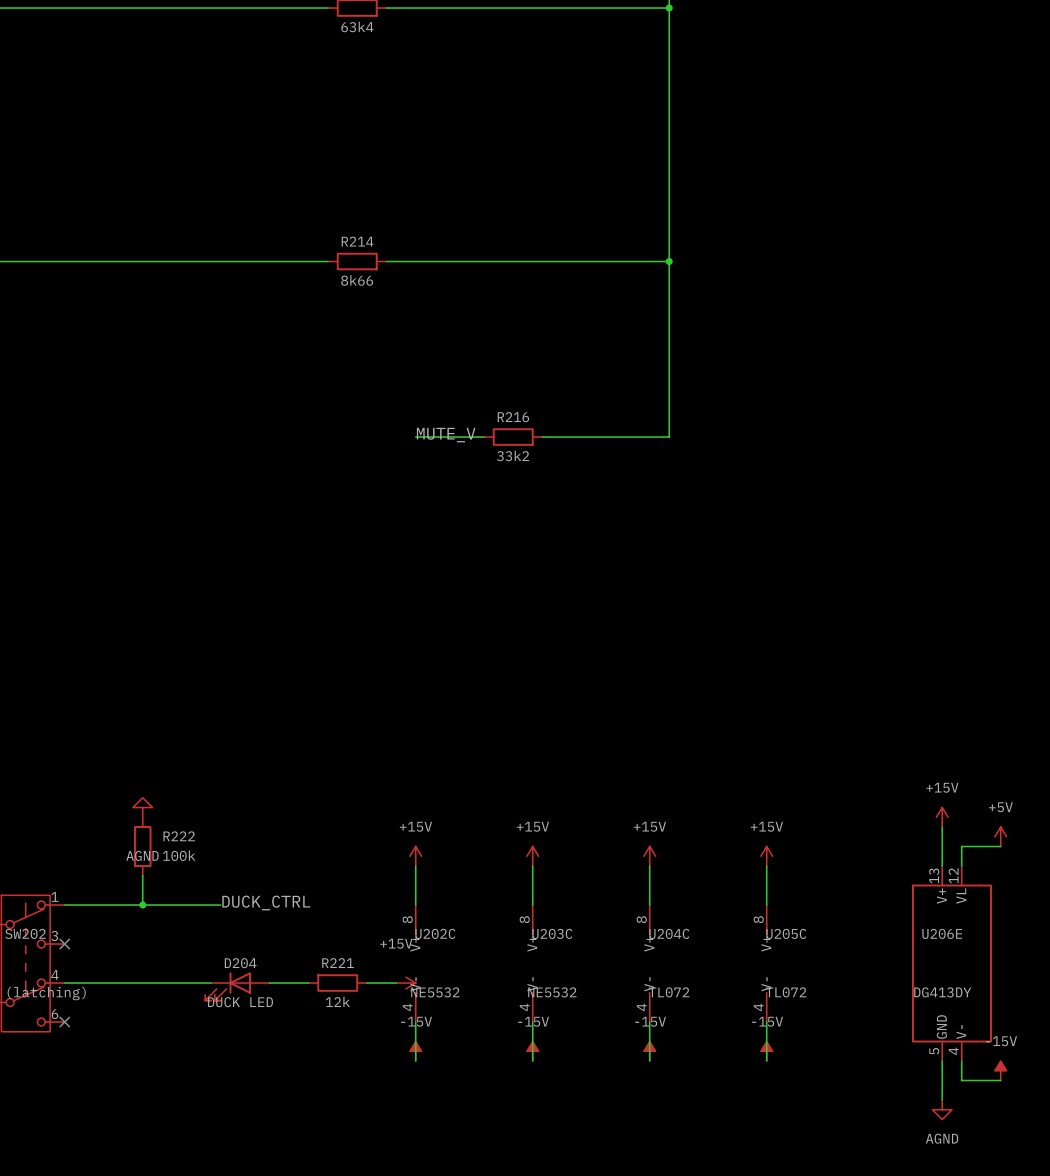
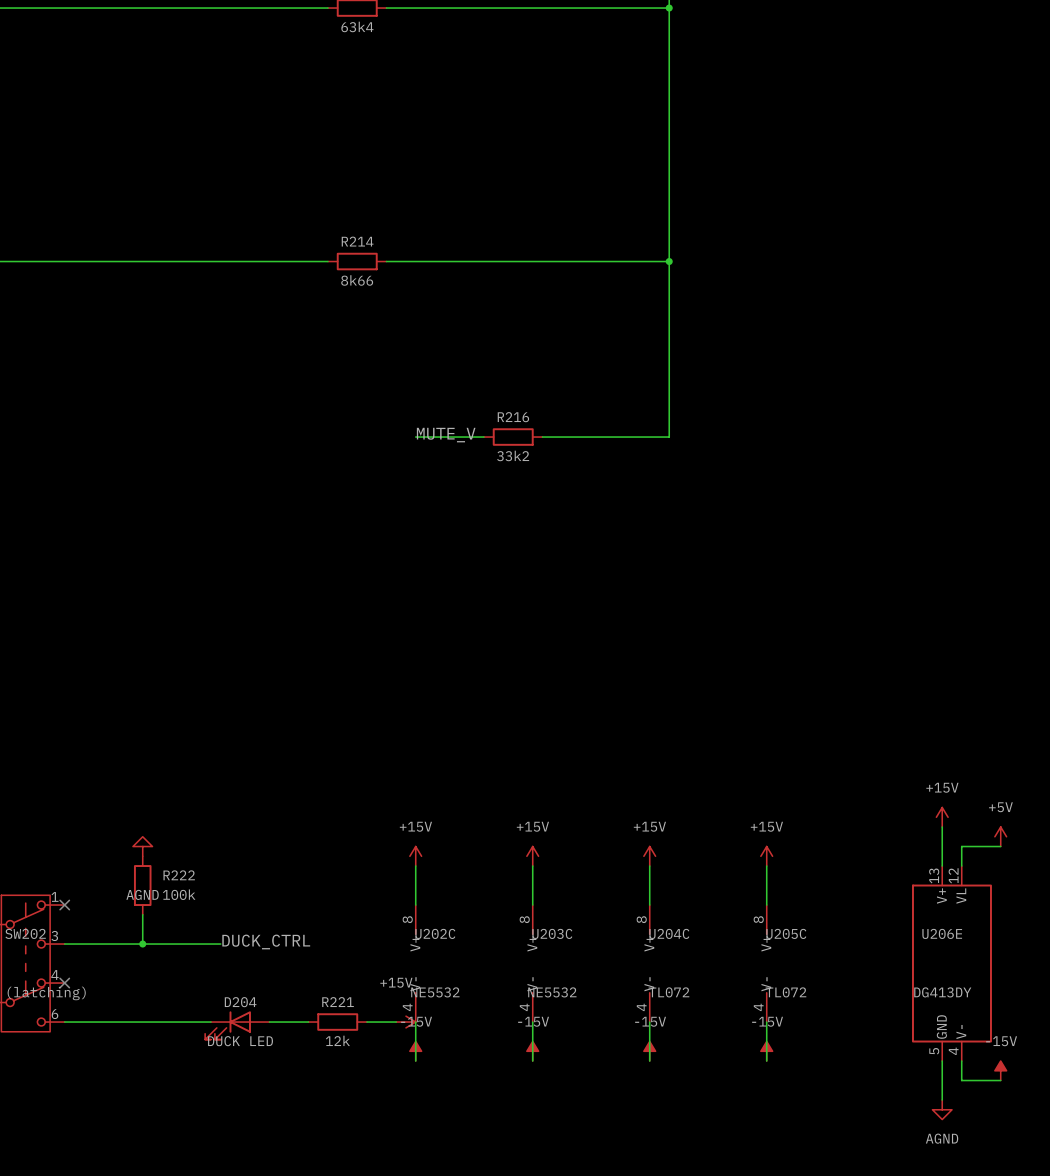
power symbol position: AGND (142, 807) -> AGND (142, 846)
R222 position: (142, 846) -> (142, 885)
wire: (142, 875) (142, 905) -> (142, 914) (142, 944)
label position: DUCK_CTRL (266, 902) -> DUCK_CTRL (266, 941)
wire: (64, 905) (220, 905) -> (64, 944) (220, 944)
no-connect mark: none -> (64, 905)
junction position: (142, 905) -> (142, 944)
no-connect mark: (64, 944) -> none
wire: (64, 983) (210, 983) -> (64, 1022) (210, 1022)
no-connect mark: none -> (64, 983)
wire: (269, 983) (308, 983) -> (269, 1022) (308, 1022)
R221 position: (337, 983) -> (337, 1022)
wire: (366, 983) (396, 983) -> (366, 1022) (396, 1022)
power symbol position: +15V (405, 983) -> +15V (405, 1022)
D204 position: (237, 986) -> (237, 1025)
no-connect mark: (64, 1022) -> none

